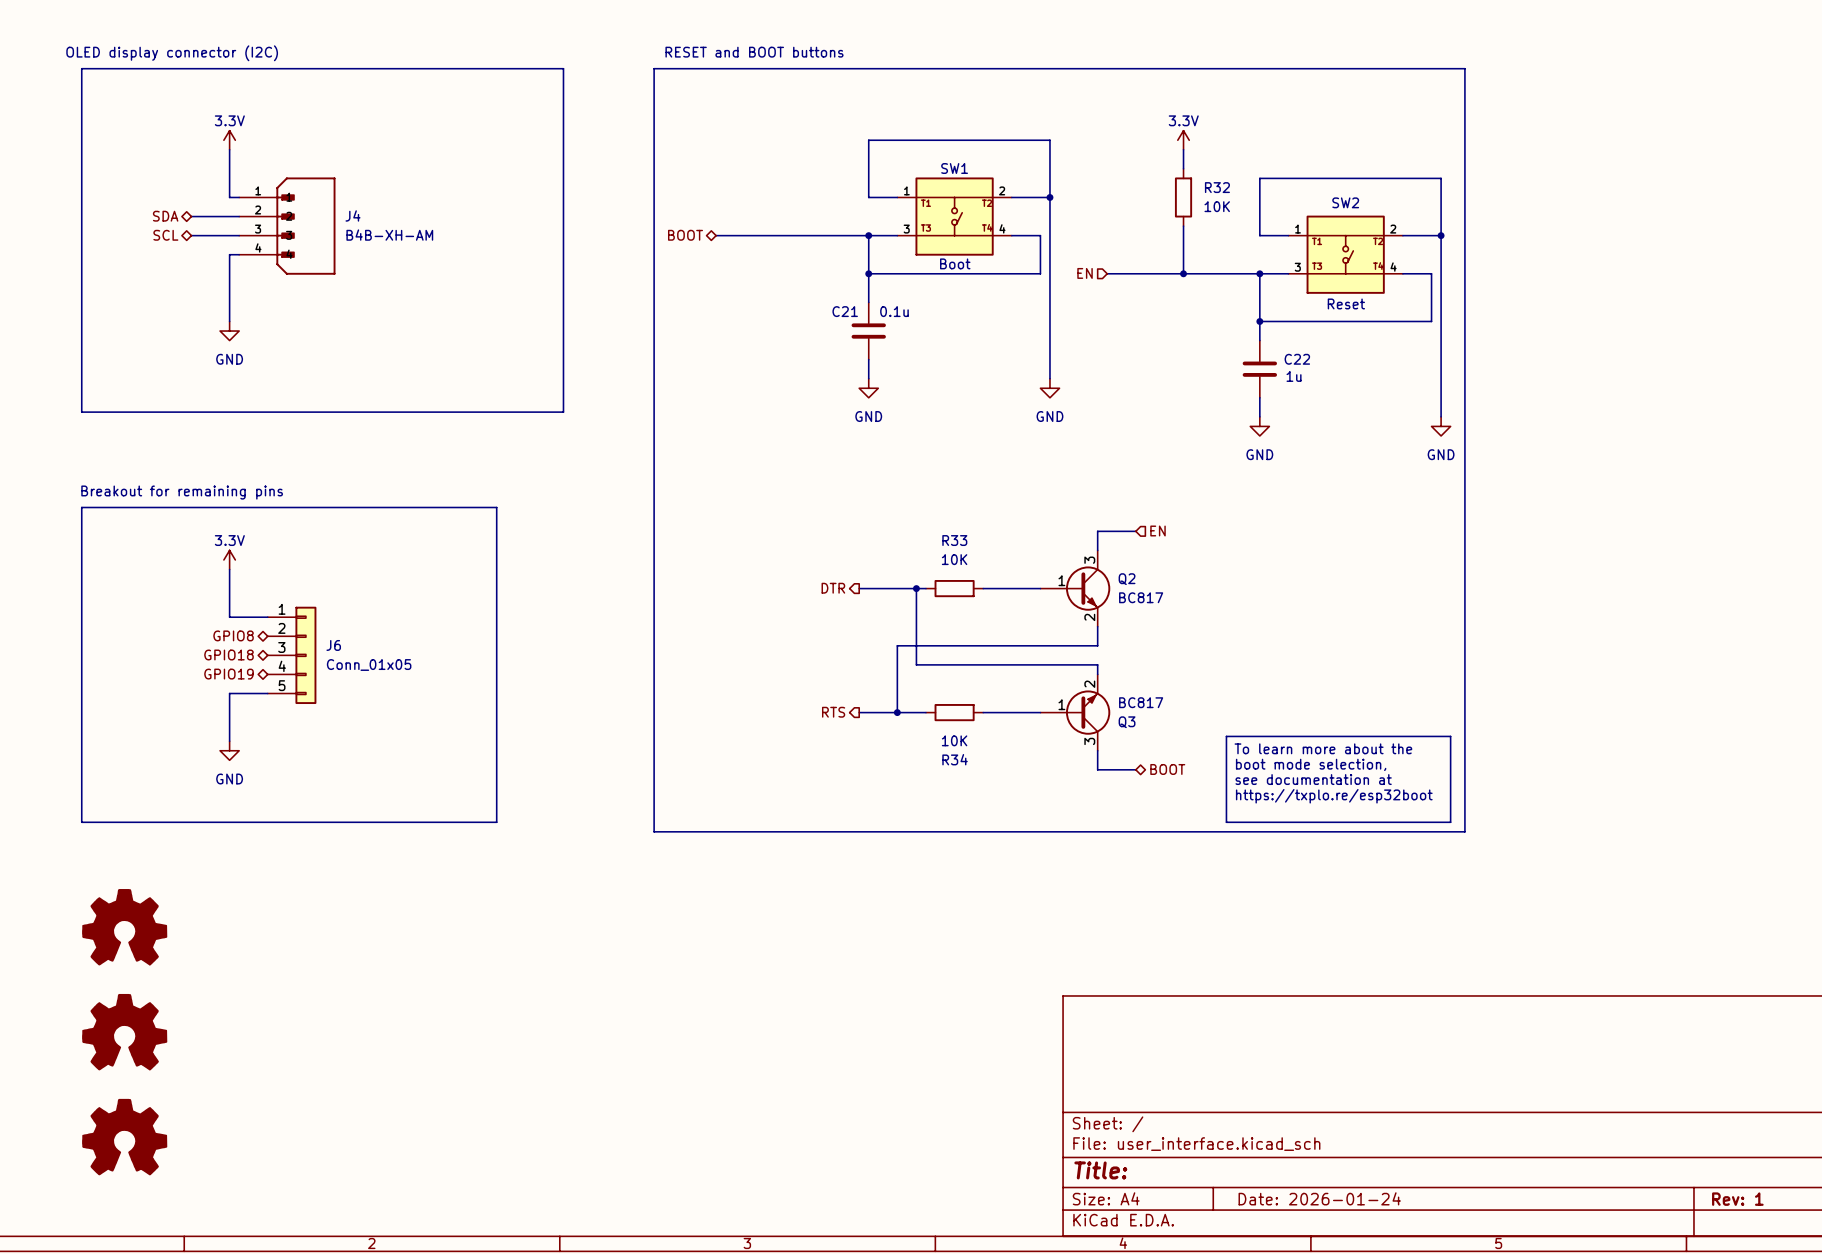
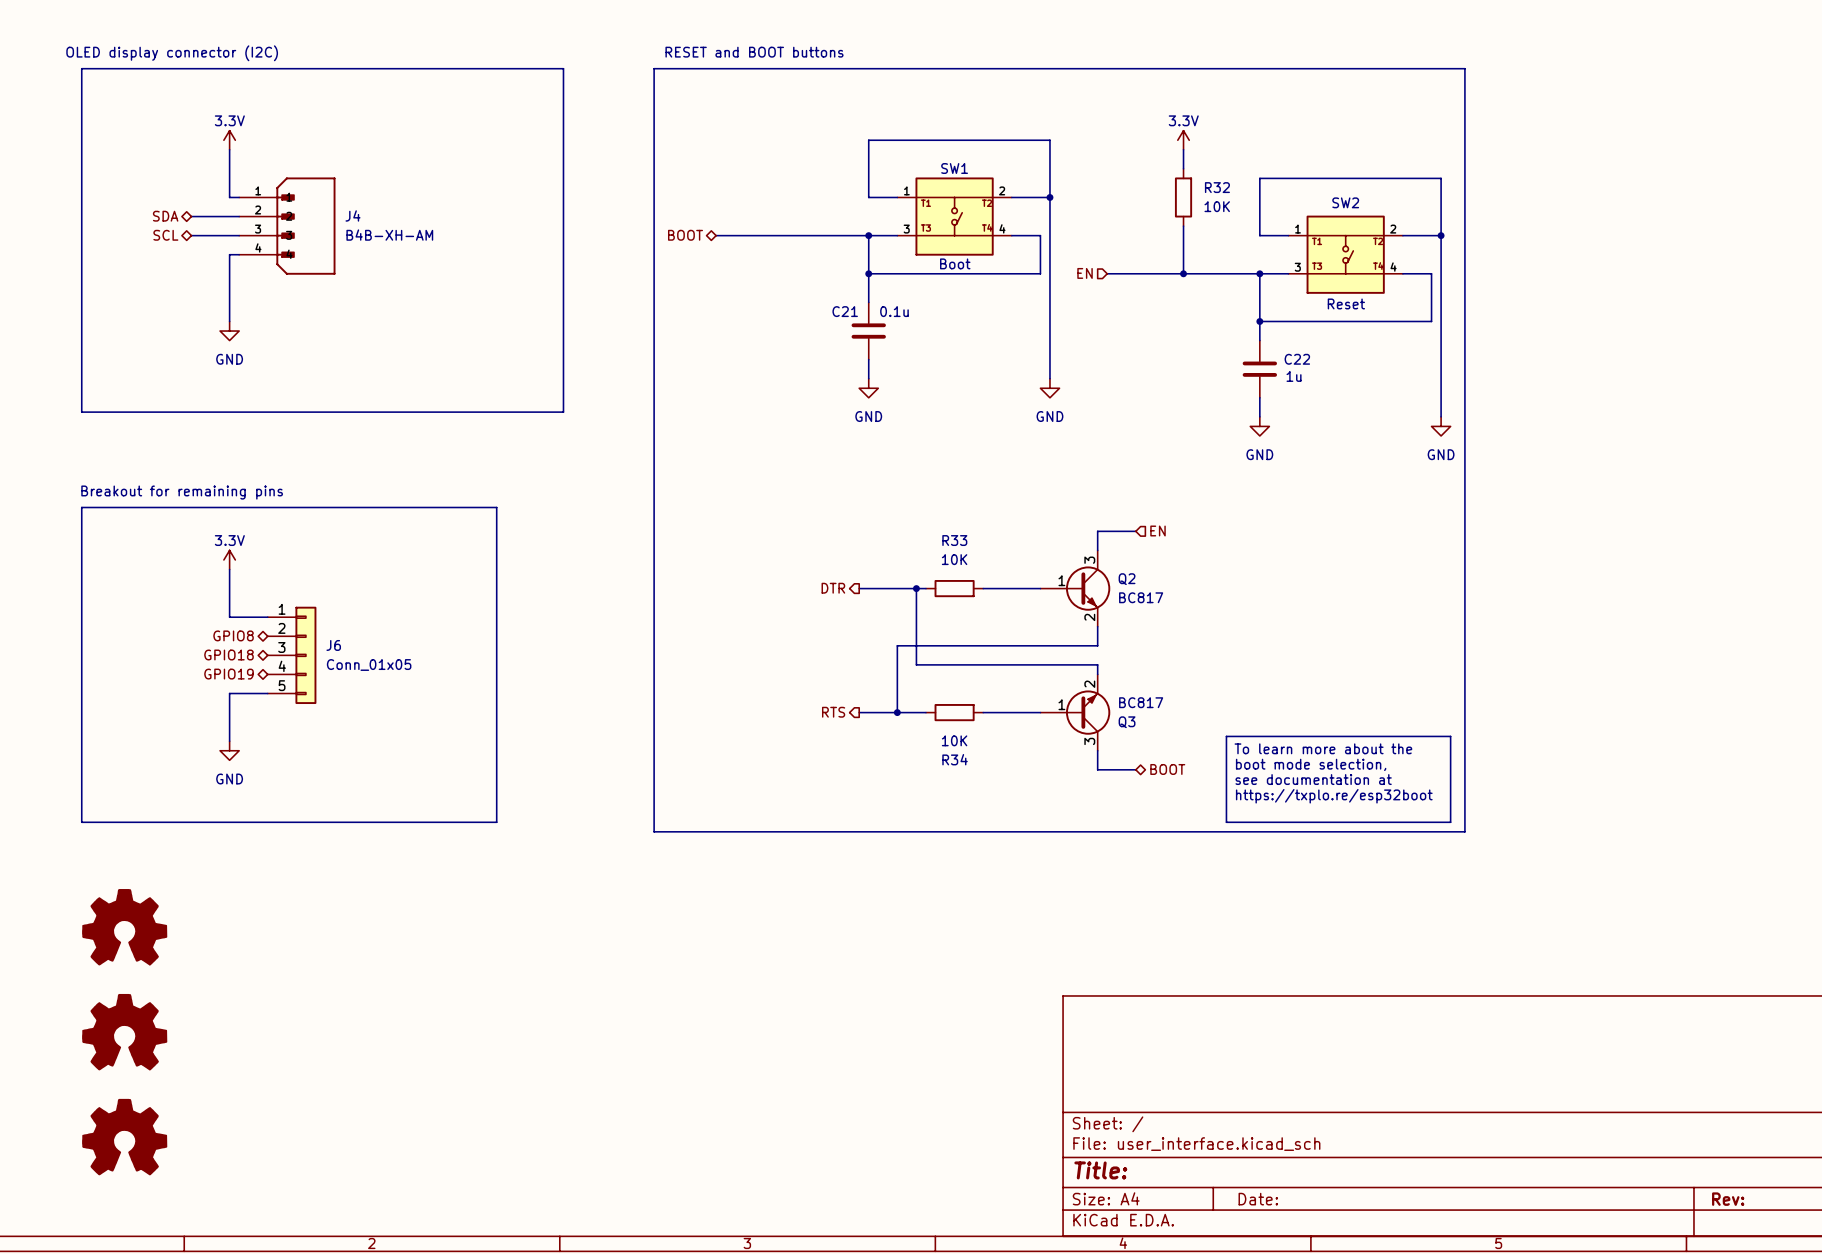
title block: Date: 2026-01-24 (1319, 1198) -> Date: (1258, 1199)
title block: Rev: 1 (1737, 1199) -> Rev: (1728, 1199)

